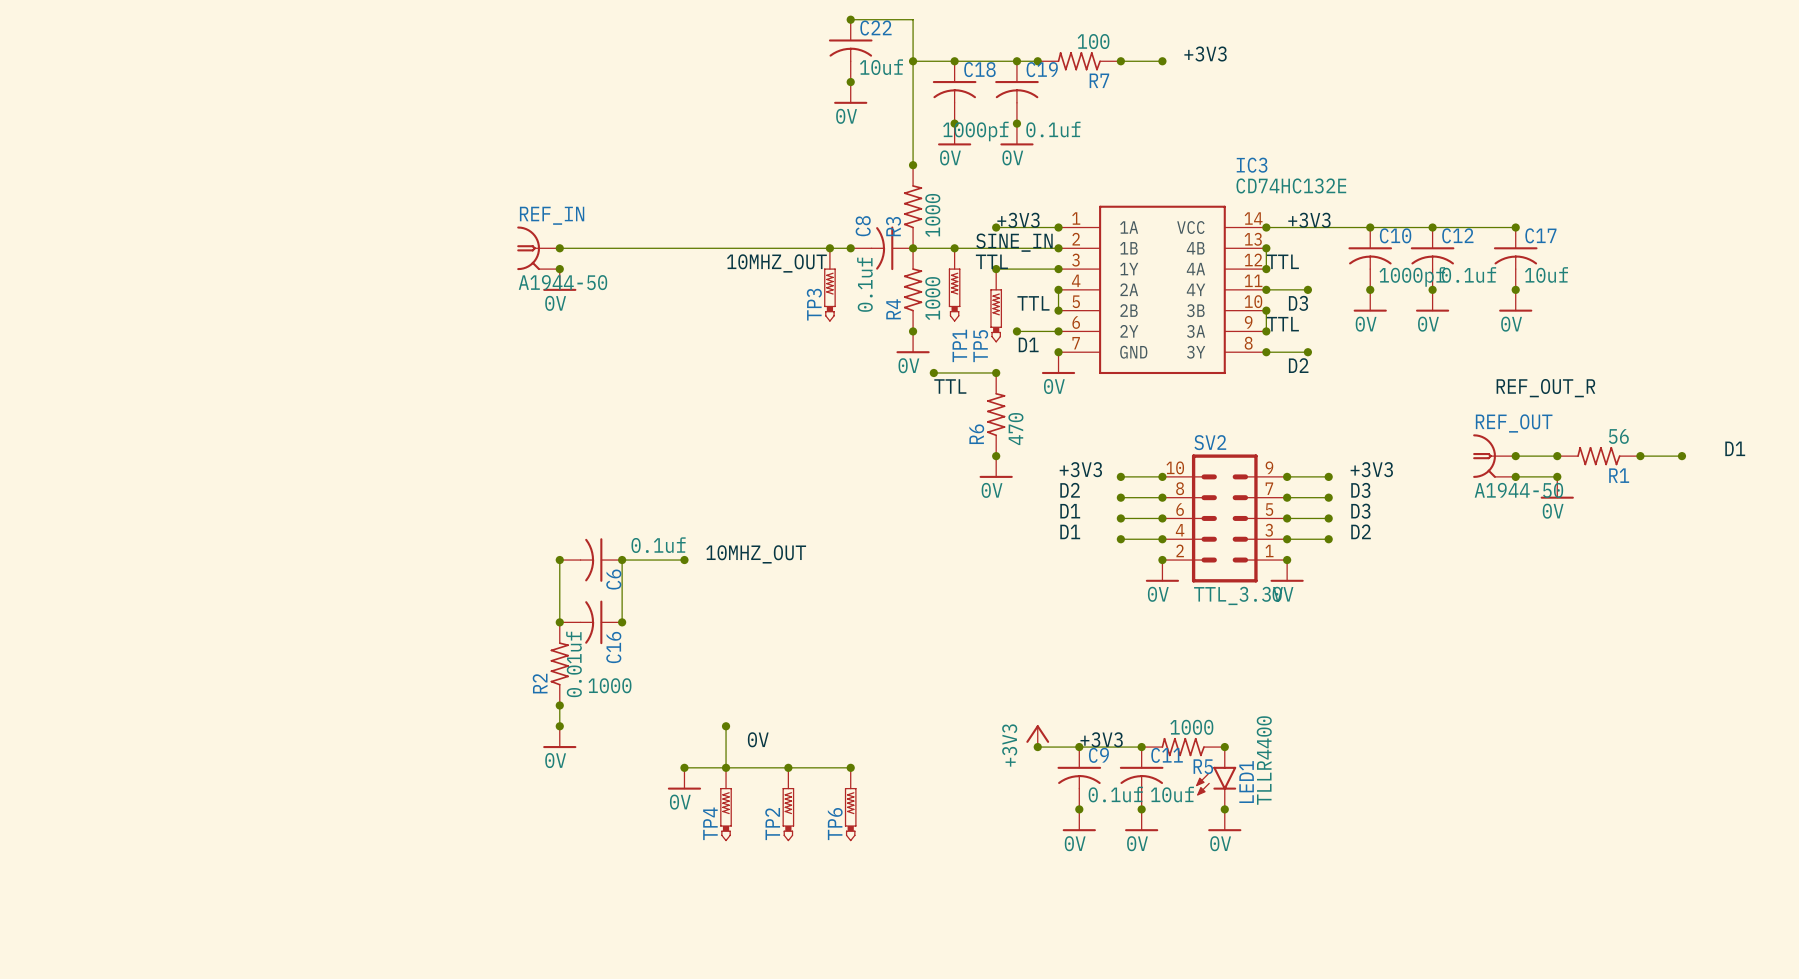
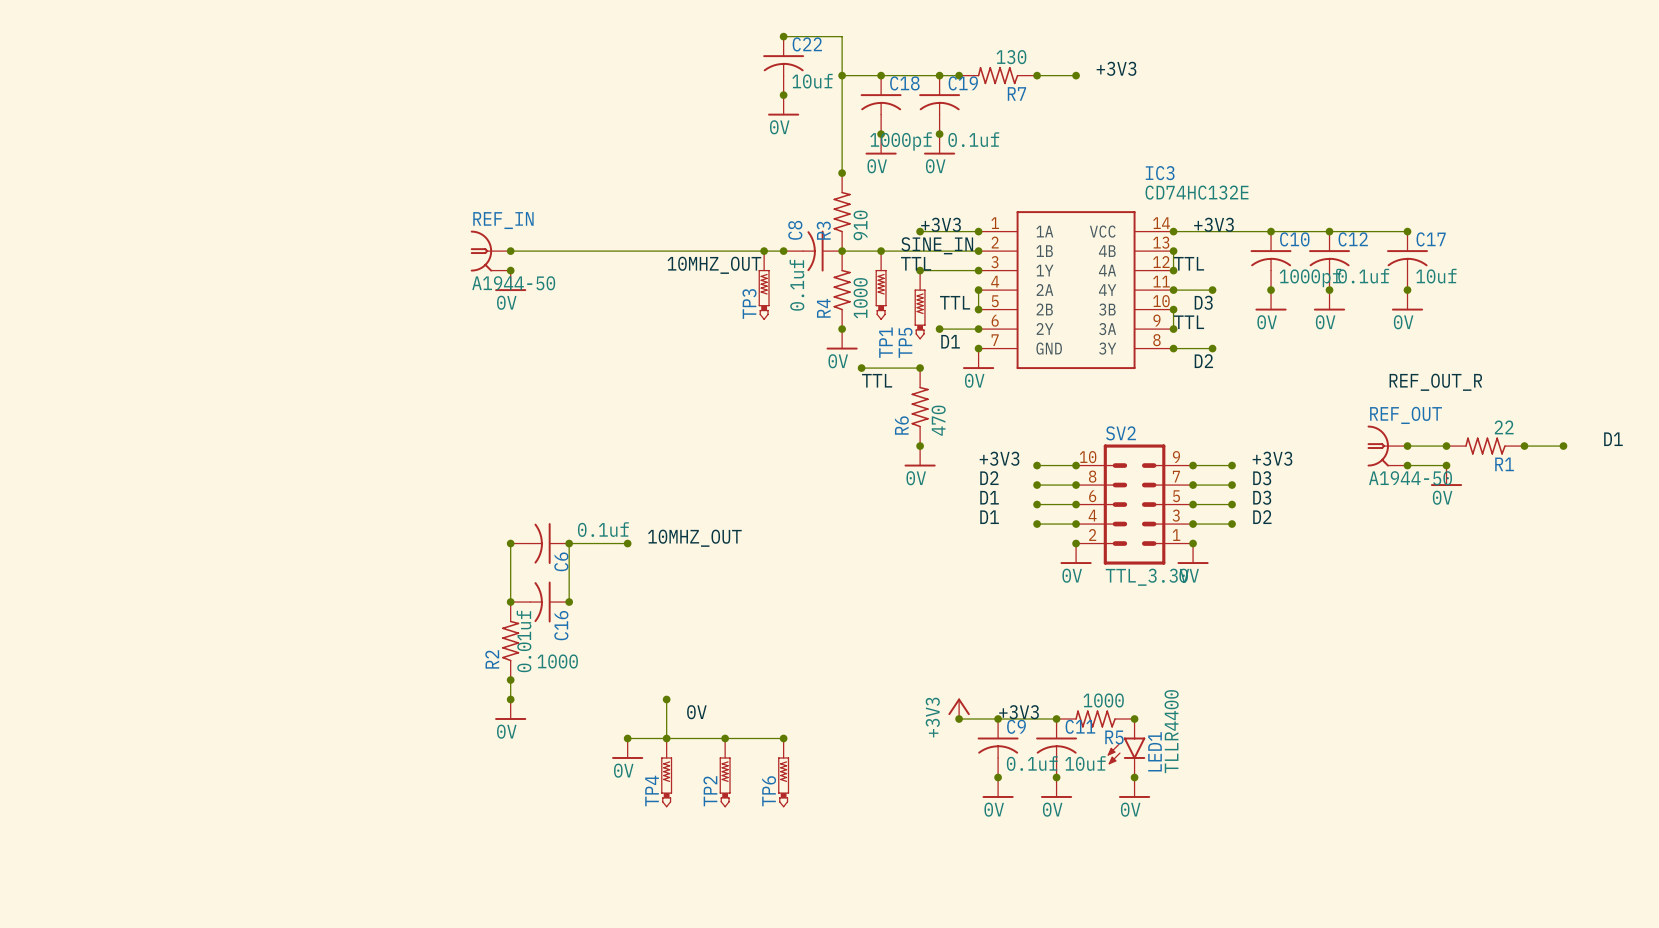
R7 value: 100 (1093, 41) -> 130 (1011, 57)
R3 value: 1000 (932, 215) -> 910 (860, 225)
R1 value: 56 (1618, 436) -> 22 (1504, 427)

